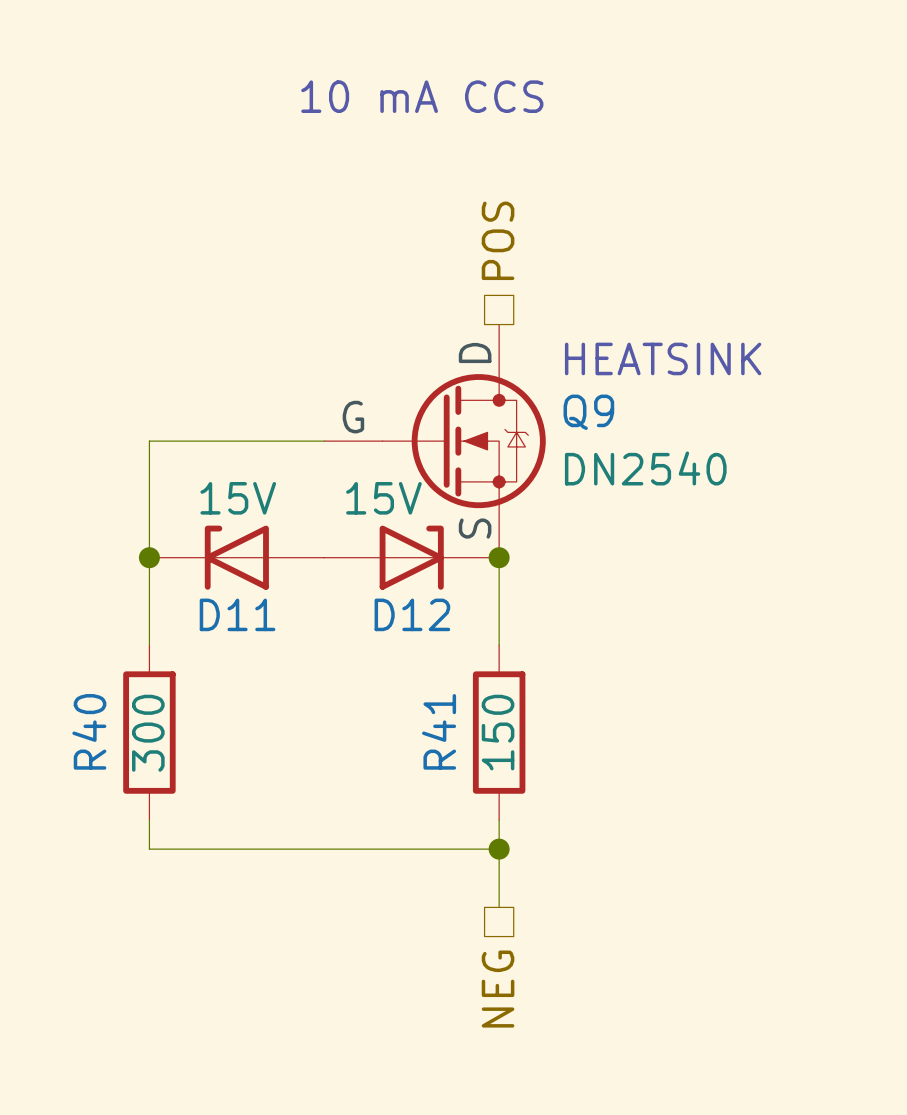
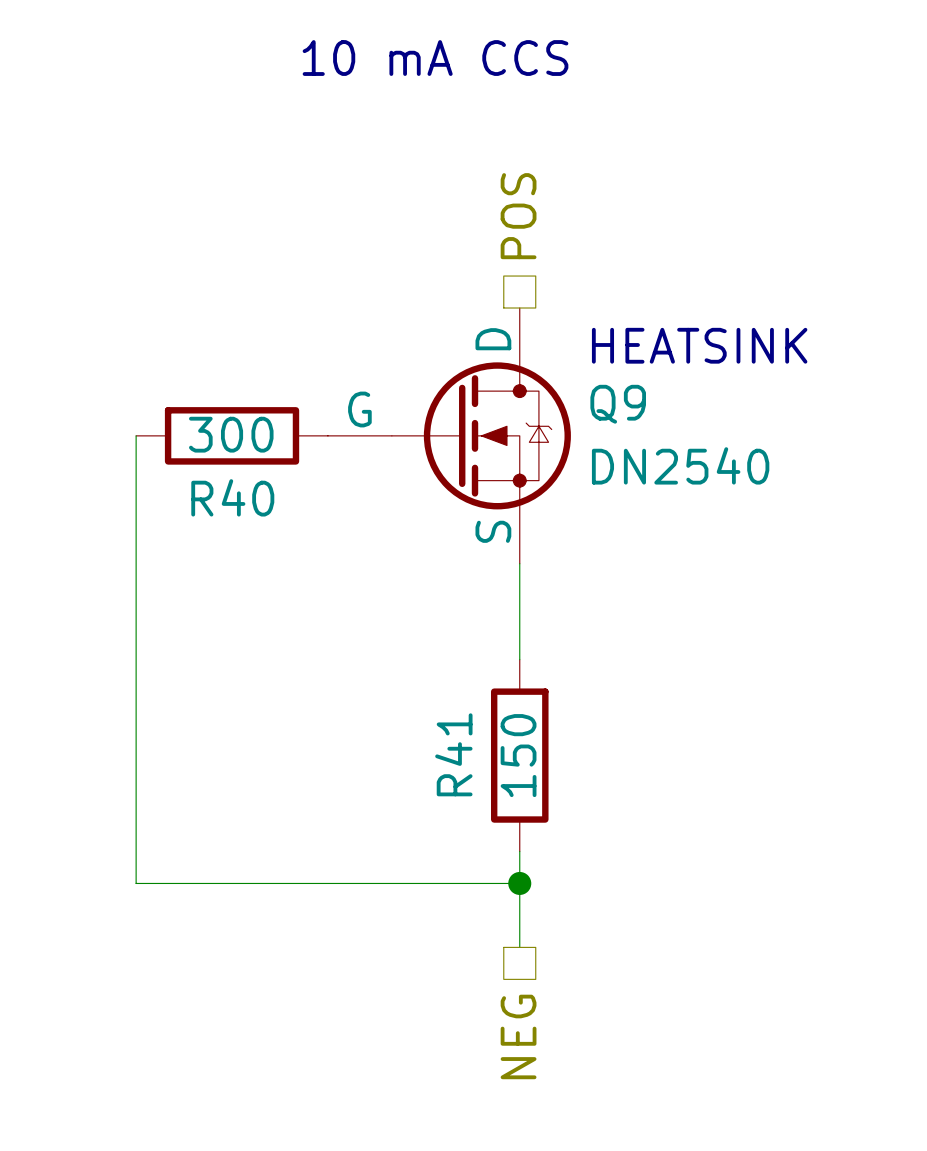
wire: (149, 441) (324, 441) -> none
junction: (149, 557) -> none
D11: 15V (236, 557) -> none
D12: 15V (411, 557) -> none
junction: (499, 557) -> none
wire: none -> (136, 659) (136, 851)
R40 name position: R40 (89, 731) -> R40 (232, 497)
R40 rotation: 0° (149, 732) -> 90° clockwise (232, 435)
R40 position: (149, 732) -> (232, 435)

